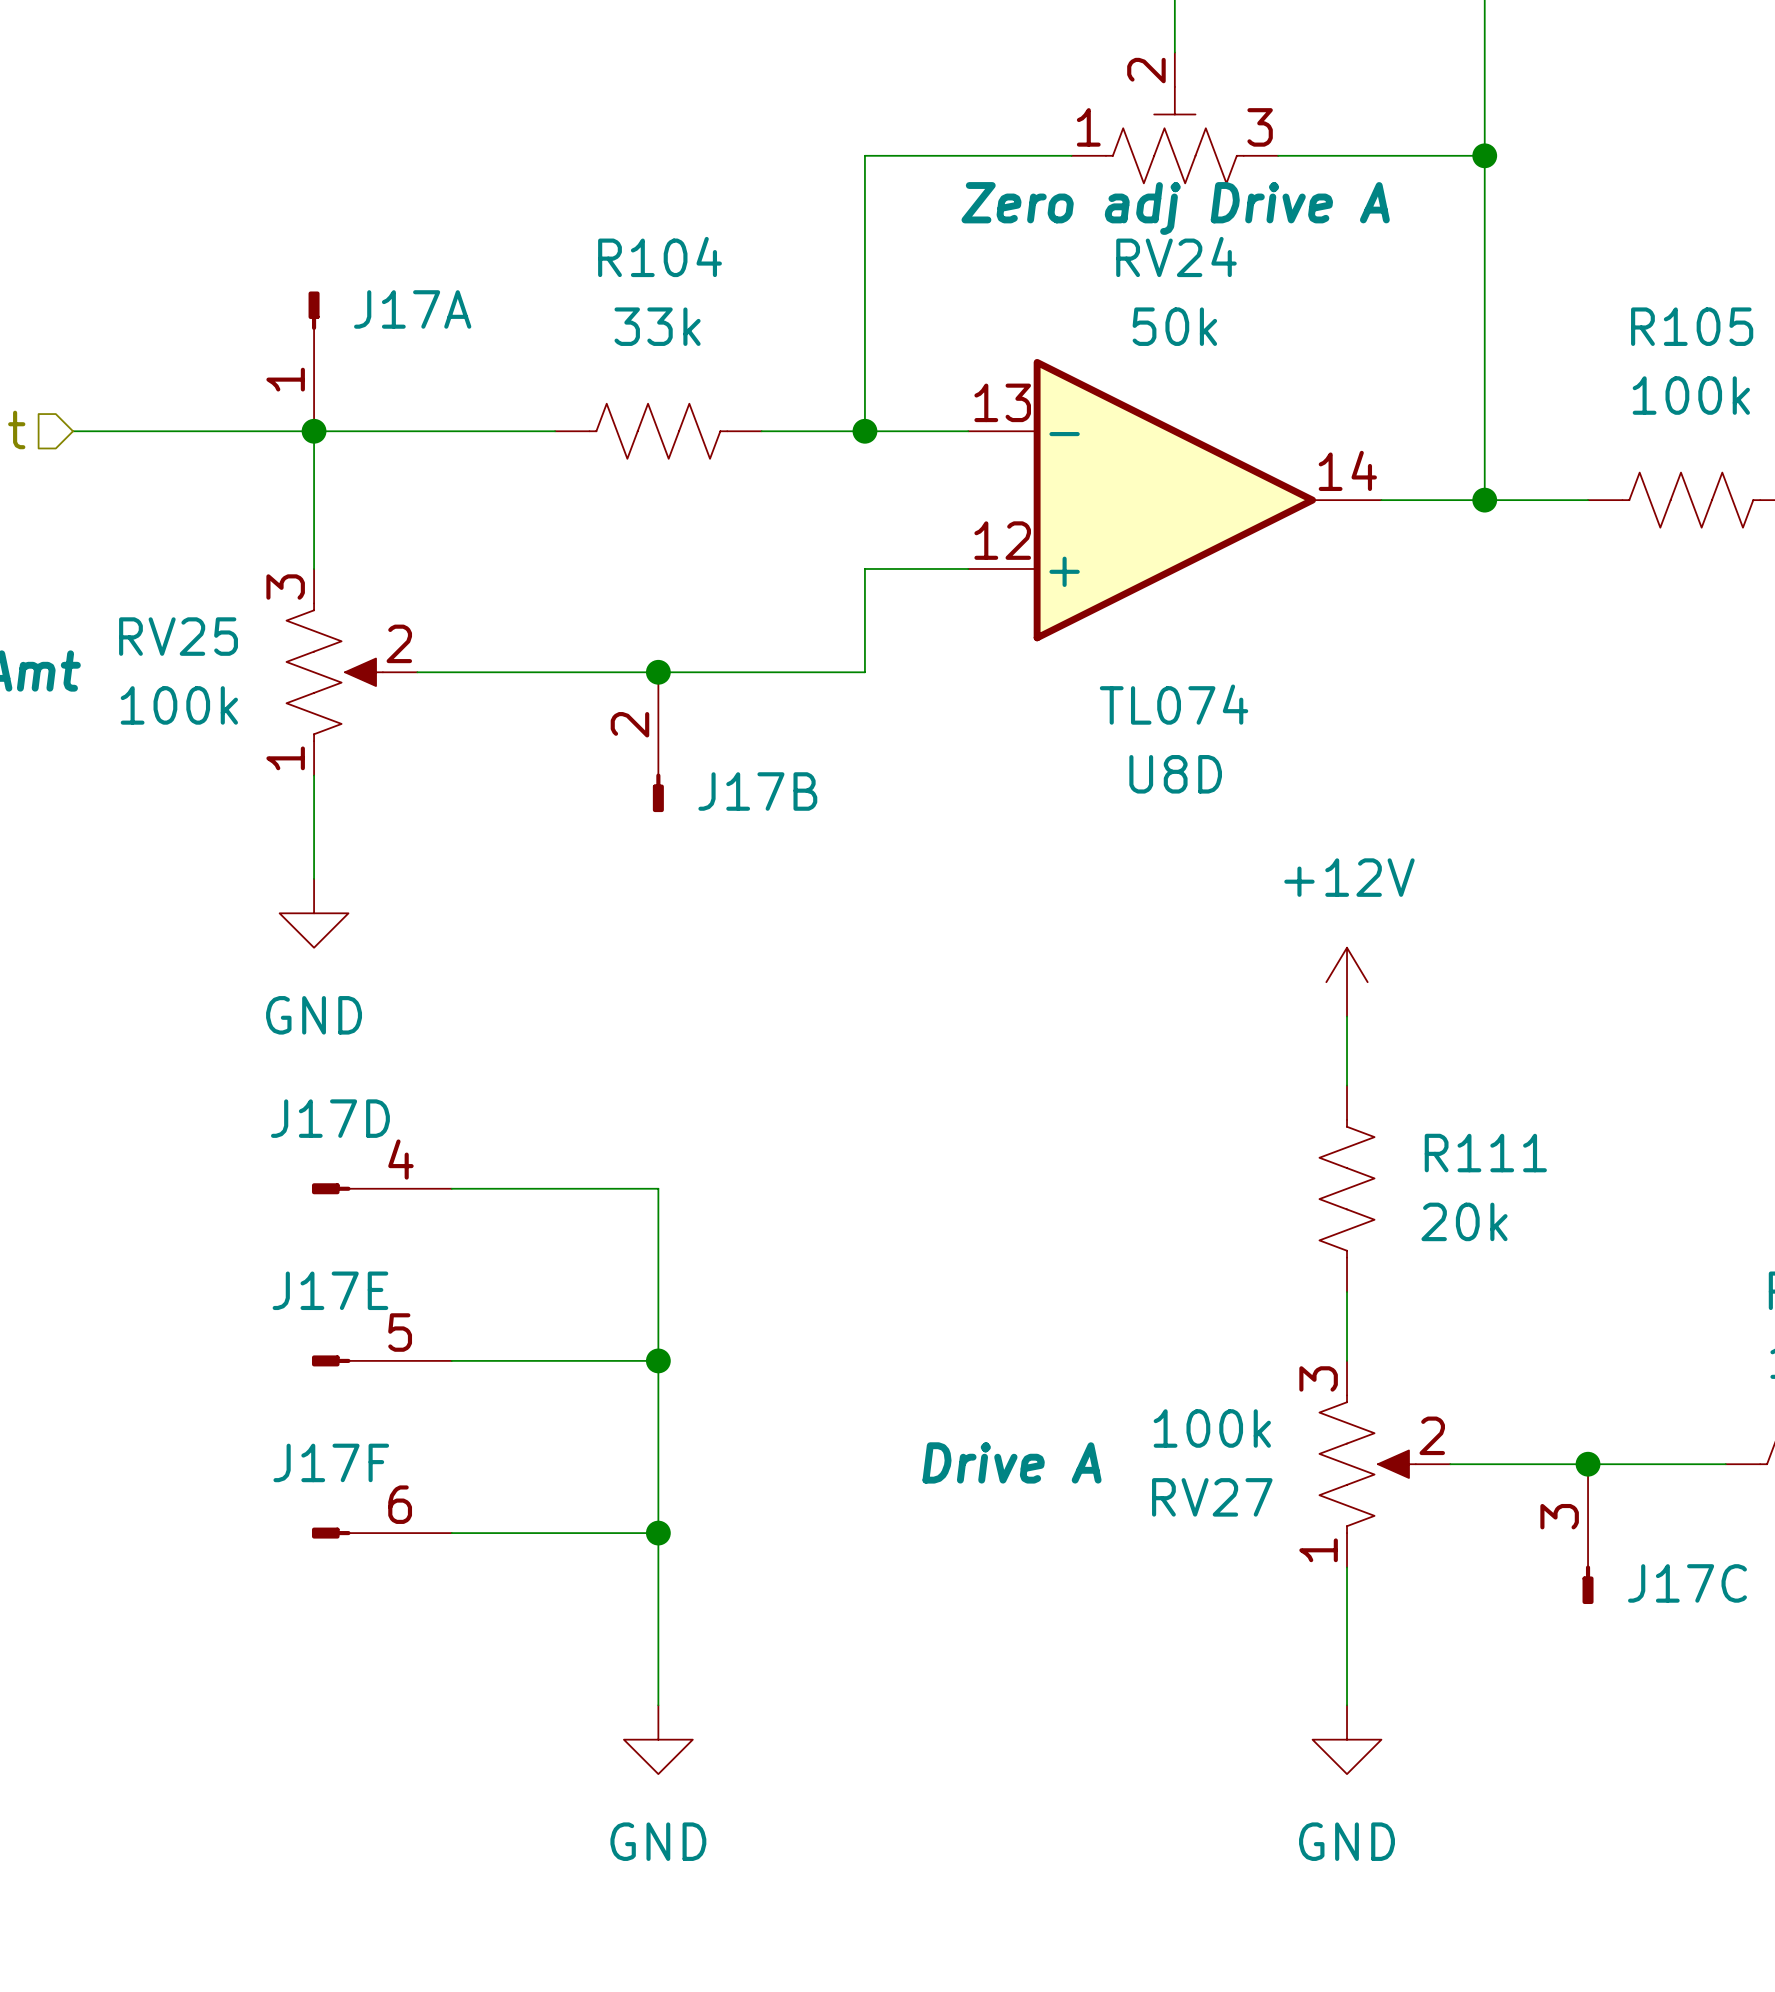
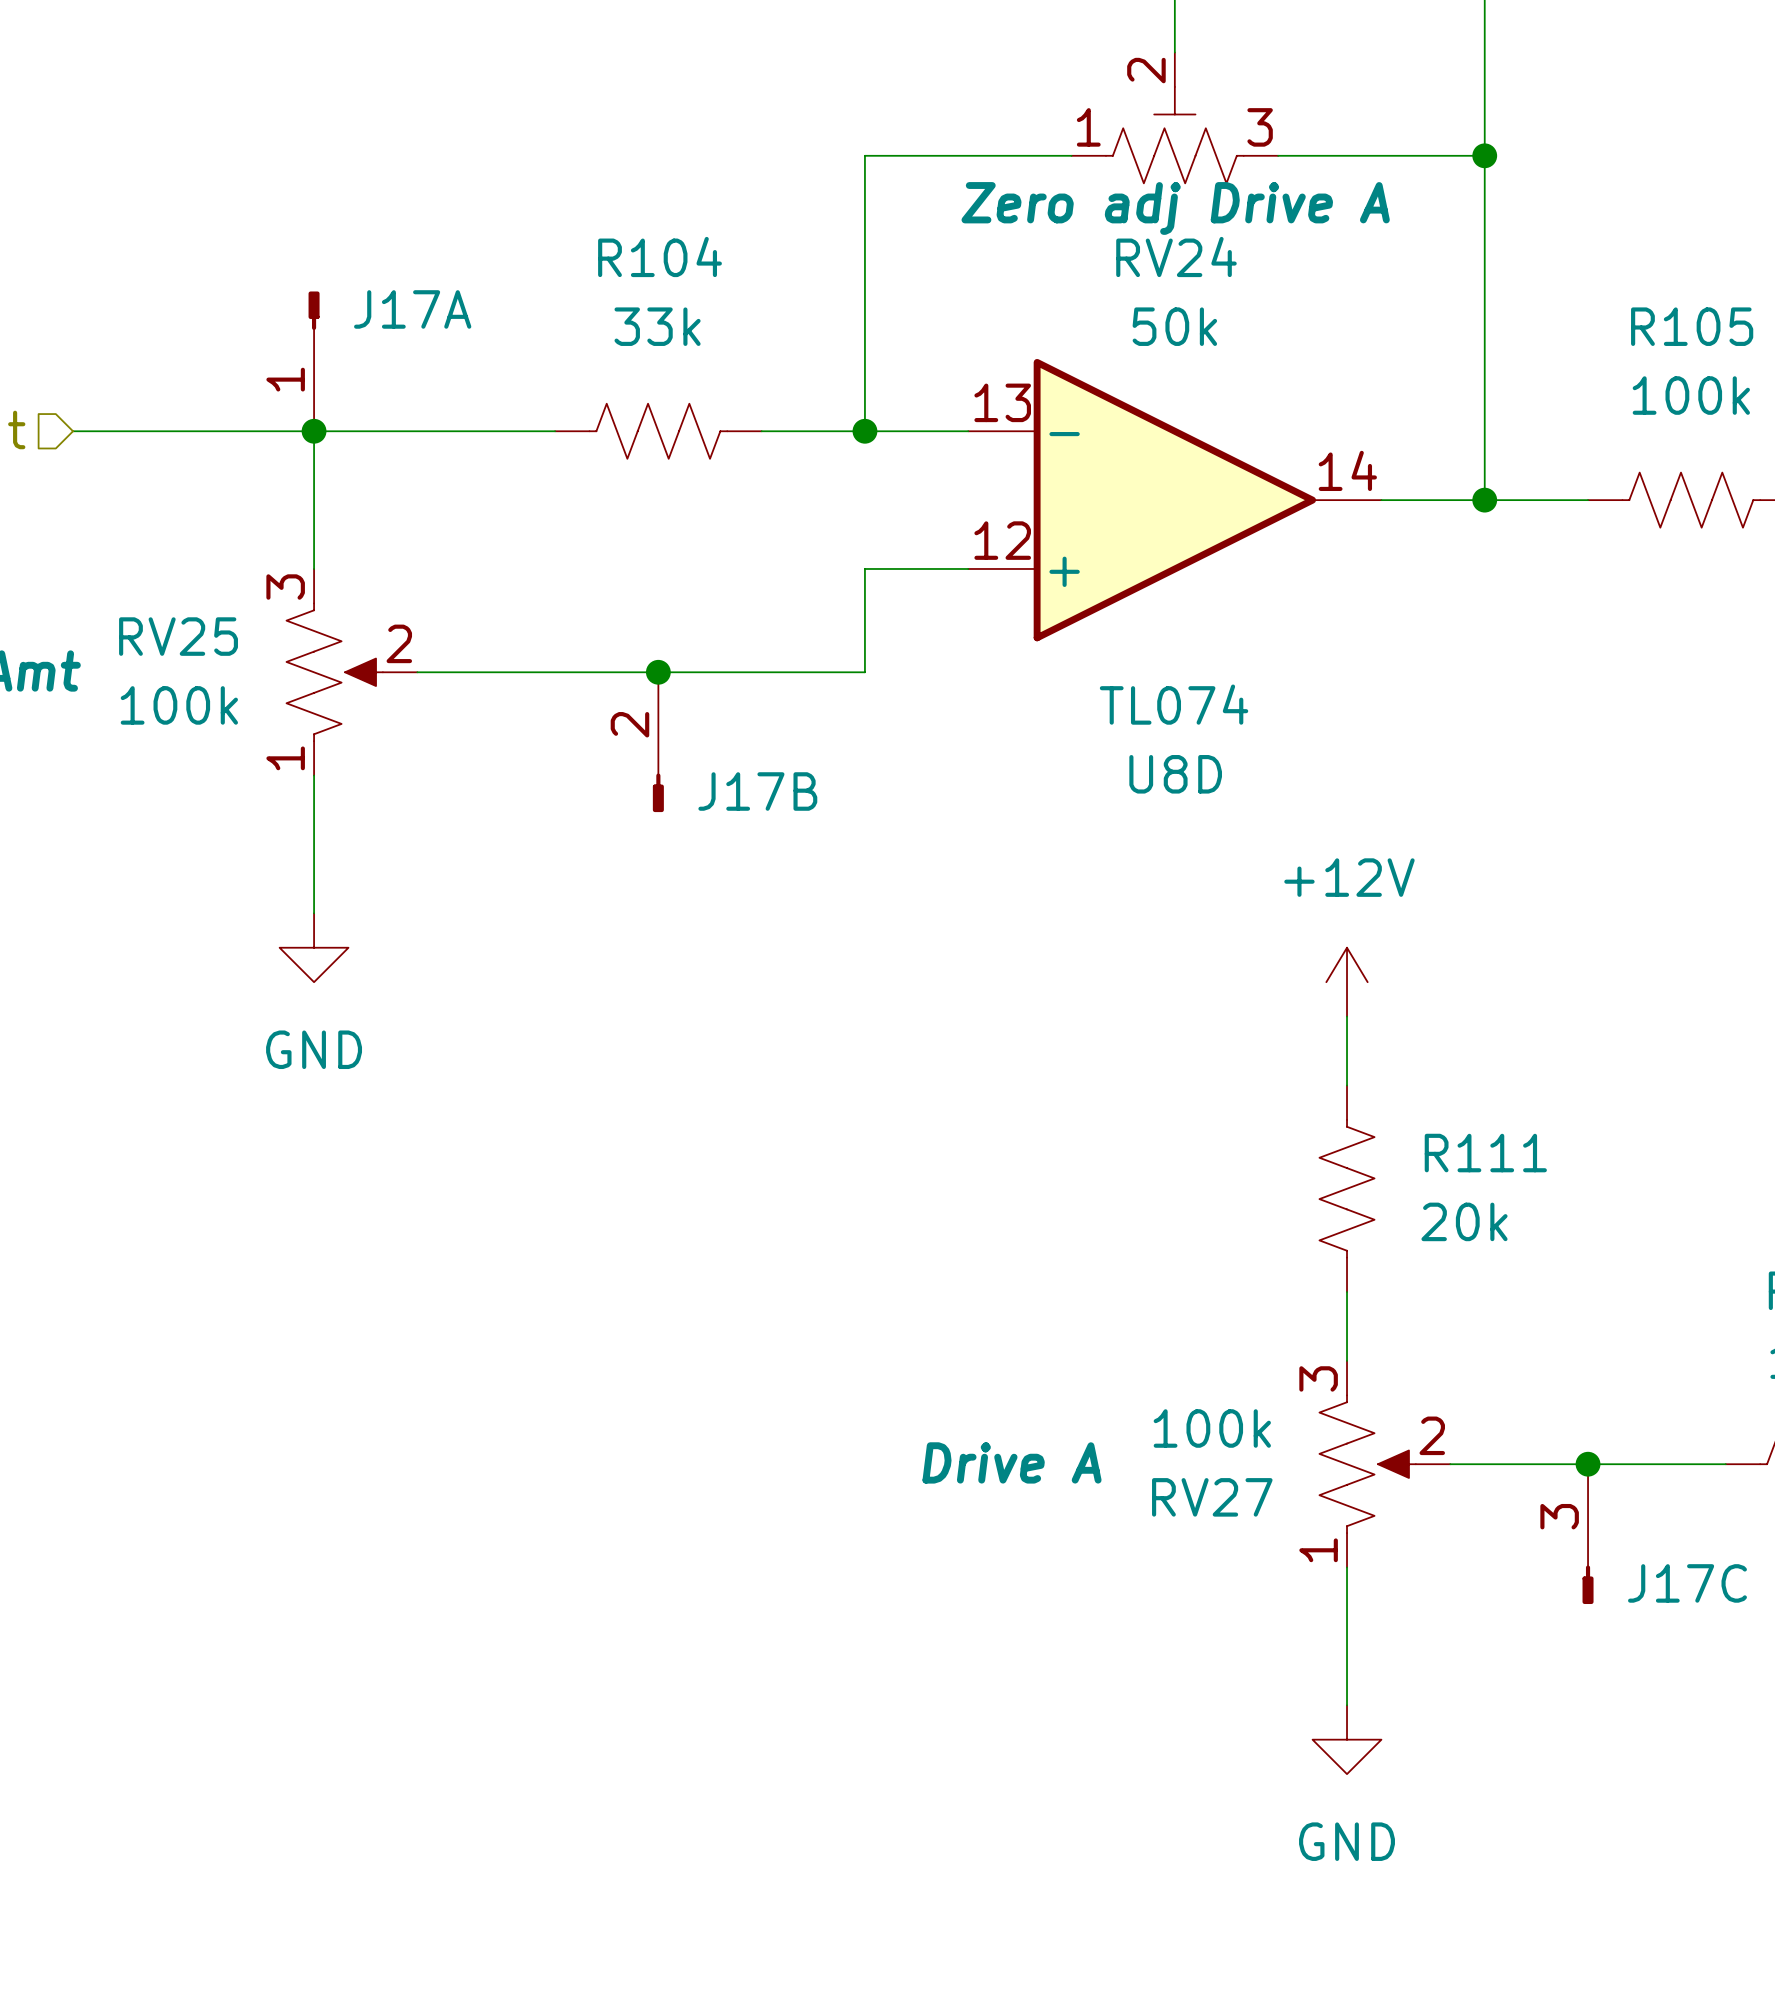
power symbol position: GND (314, 913) -> GND (314, 947)
J17D: (381, 1188) -> none
wire: (451, 1188) (658, 1188) (658, 1705) -> none
J17E: (381, 1360) -> none
wire: (451, 1360) (658, 1360) -> none
junction: (658, 1360) -> none
J17F: (381, 1533) -> none
wire: (451, 1533) (658, 1533) -> none
junction: (658, 1533) -> none
power symbol: GND (658, 1739) -> none

